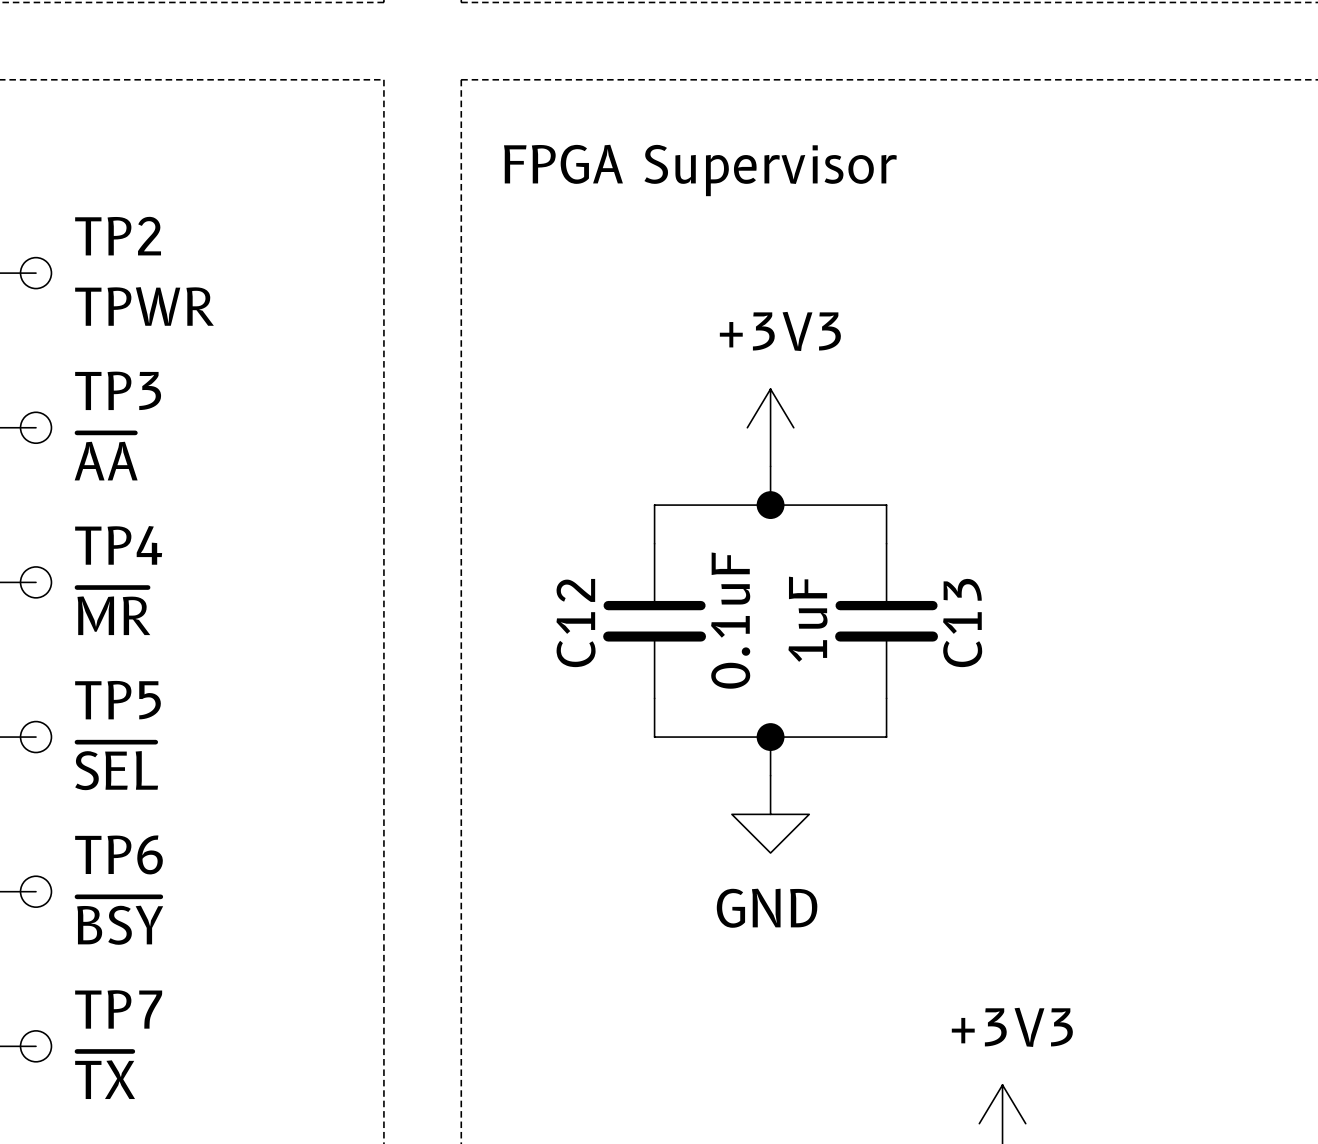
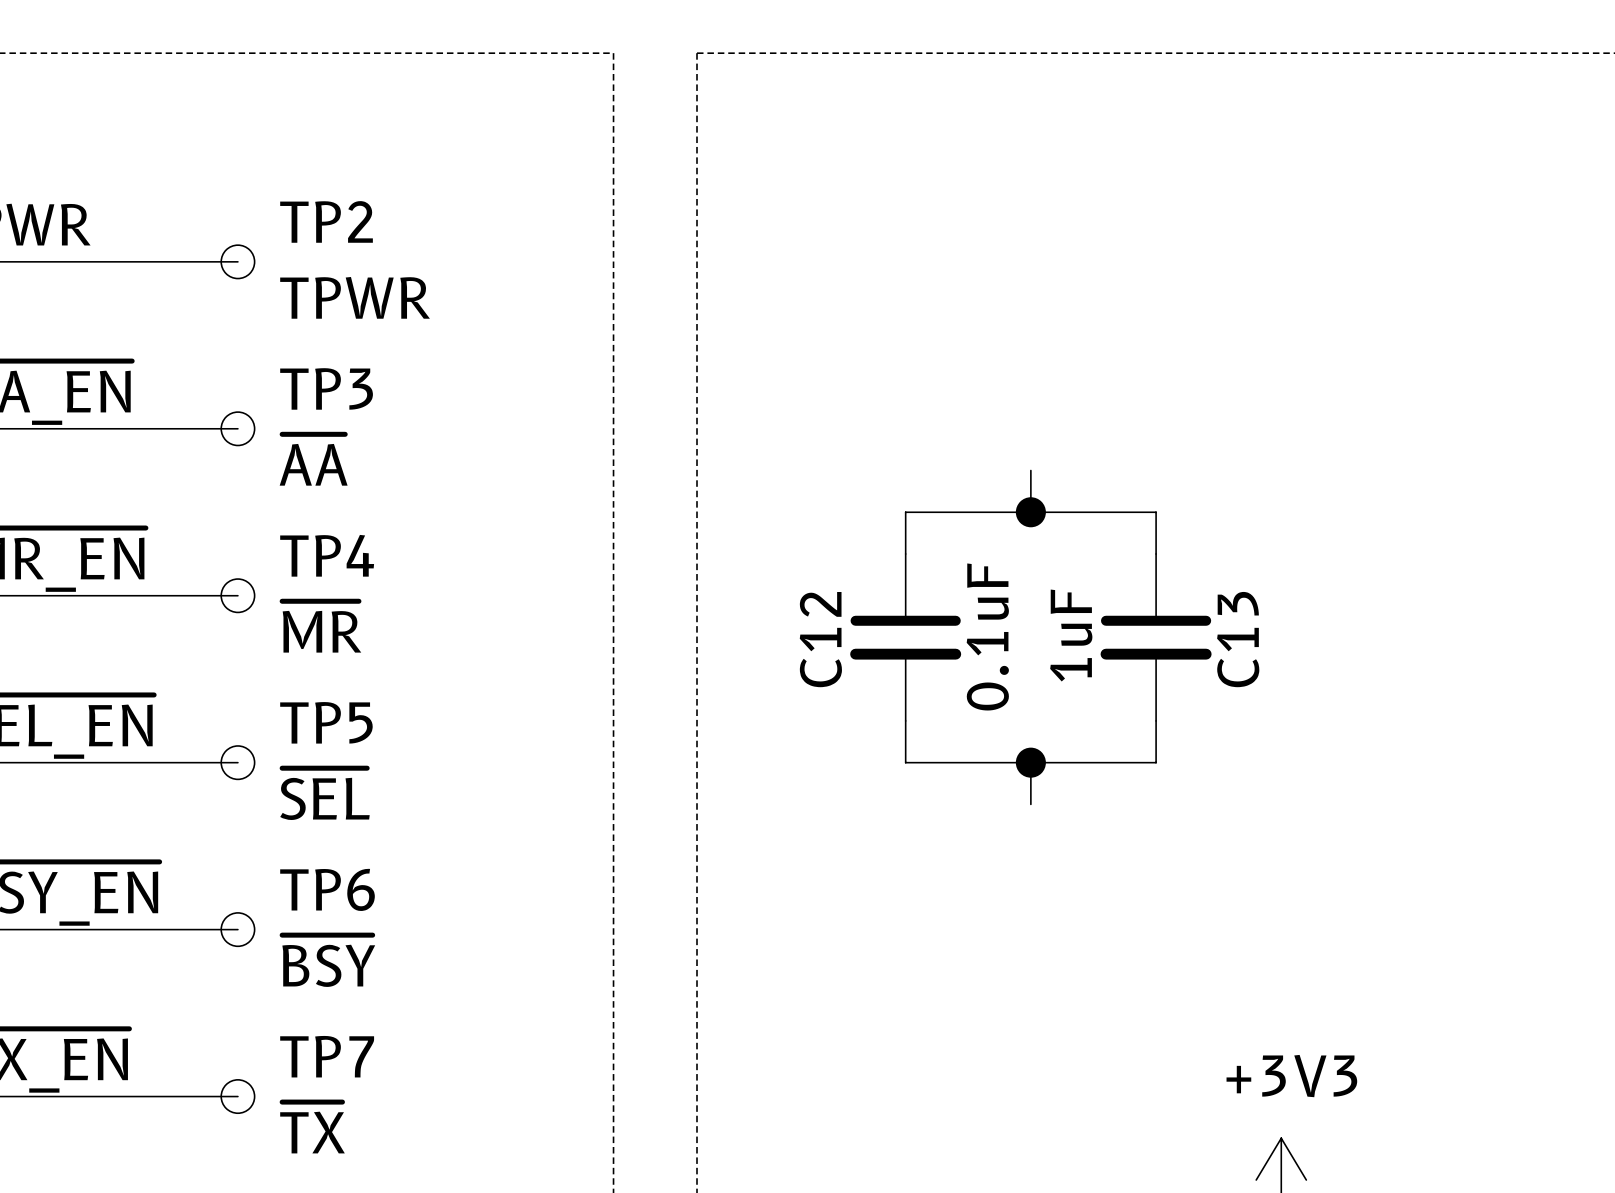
text: FPGA Supervisor (700, 170) -> none
power symbol: +3V3 (770, 427) -> none
power symbol: GND (770, 814) -> none

